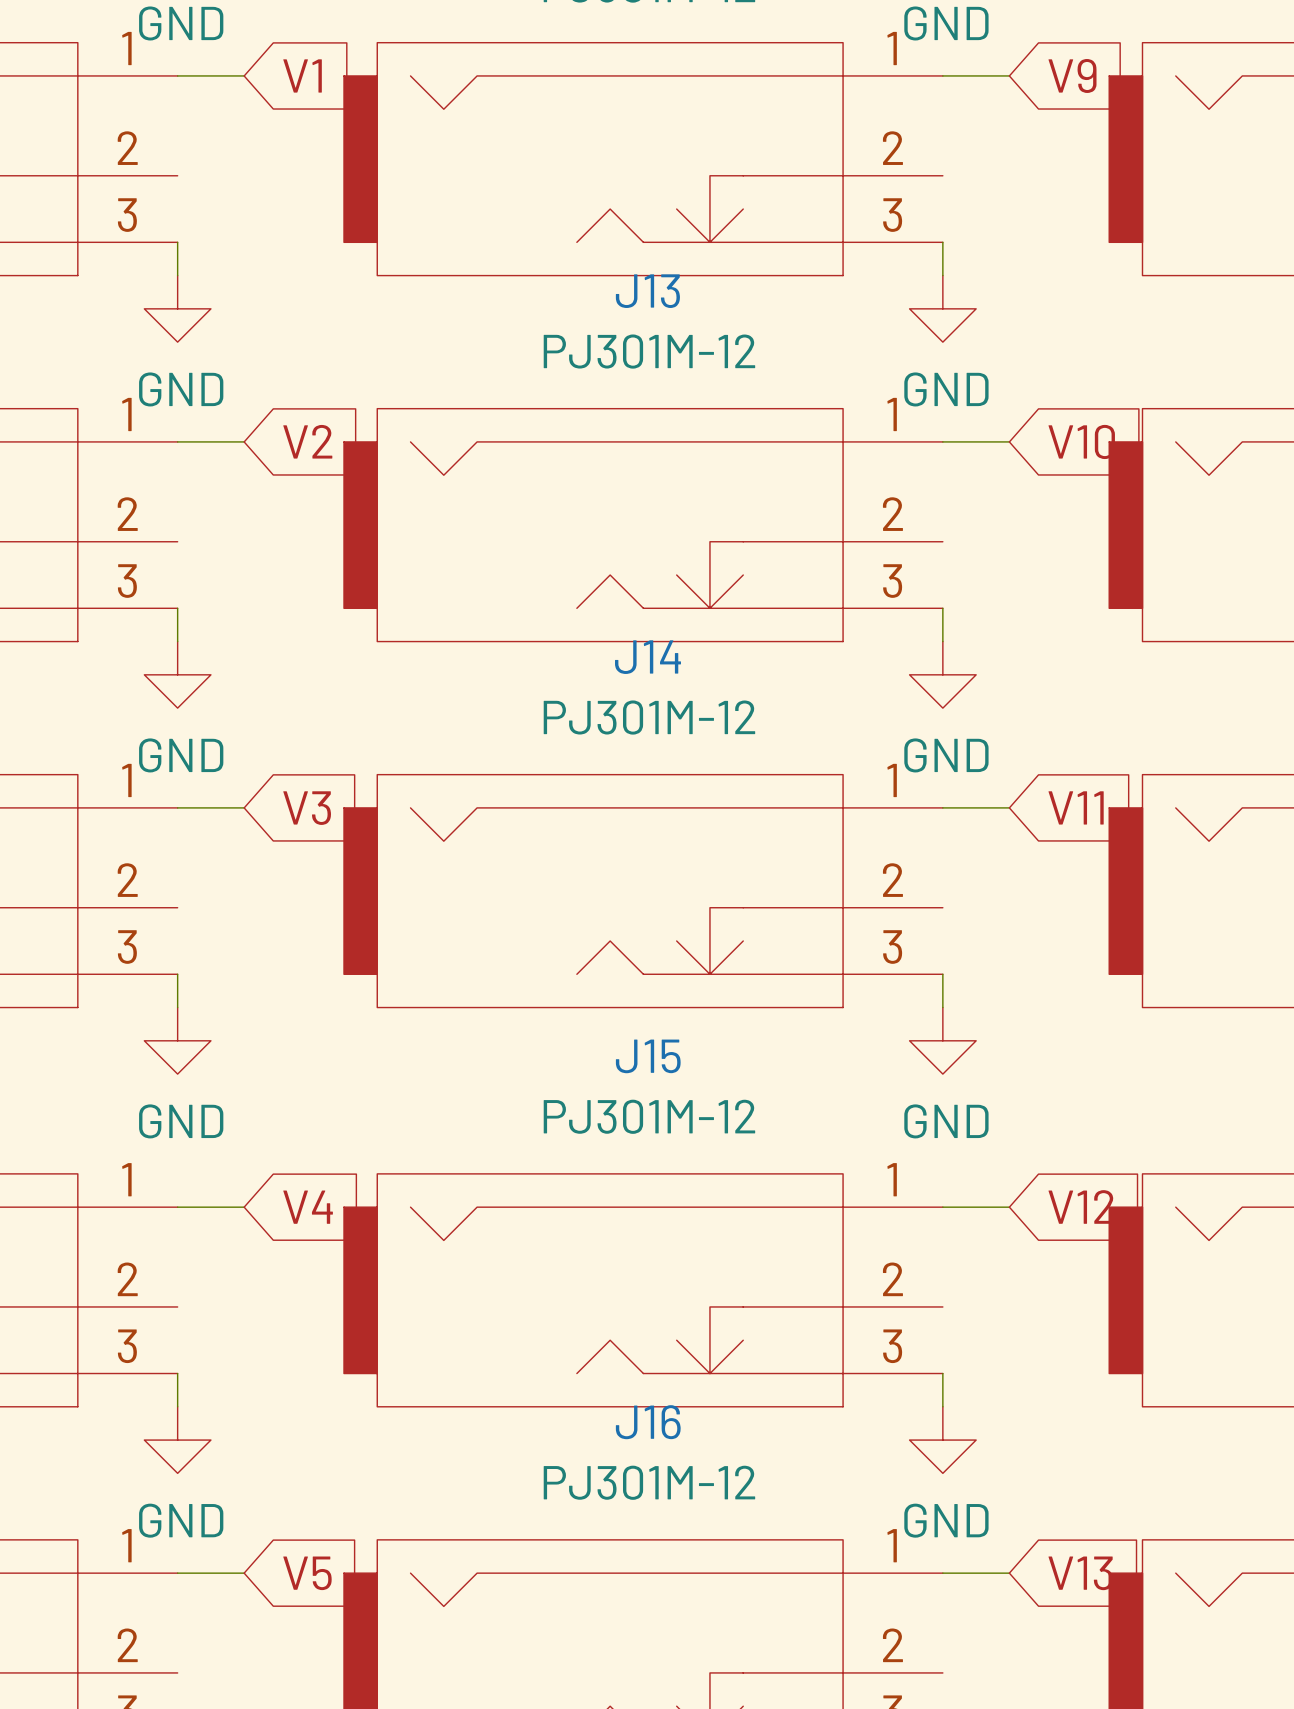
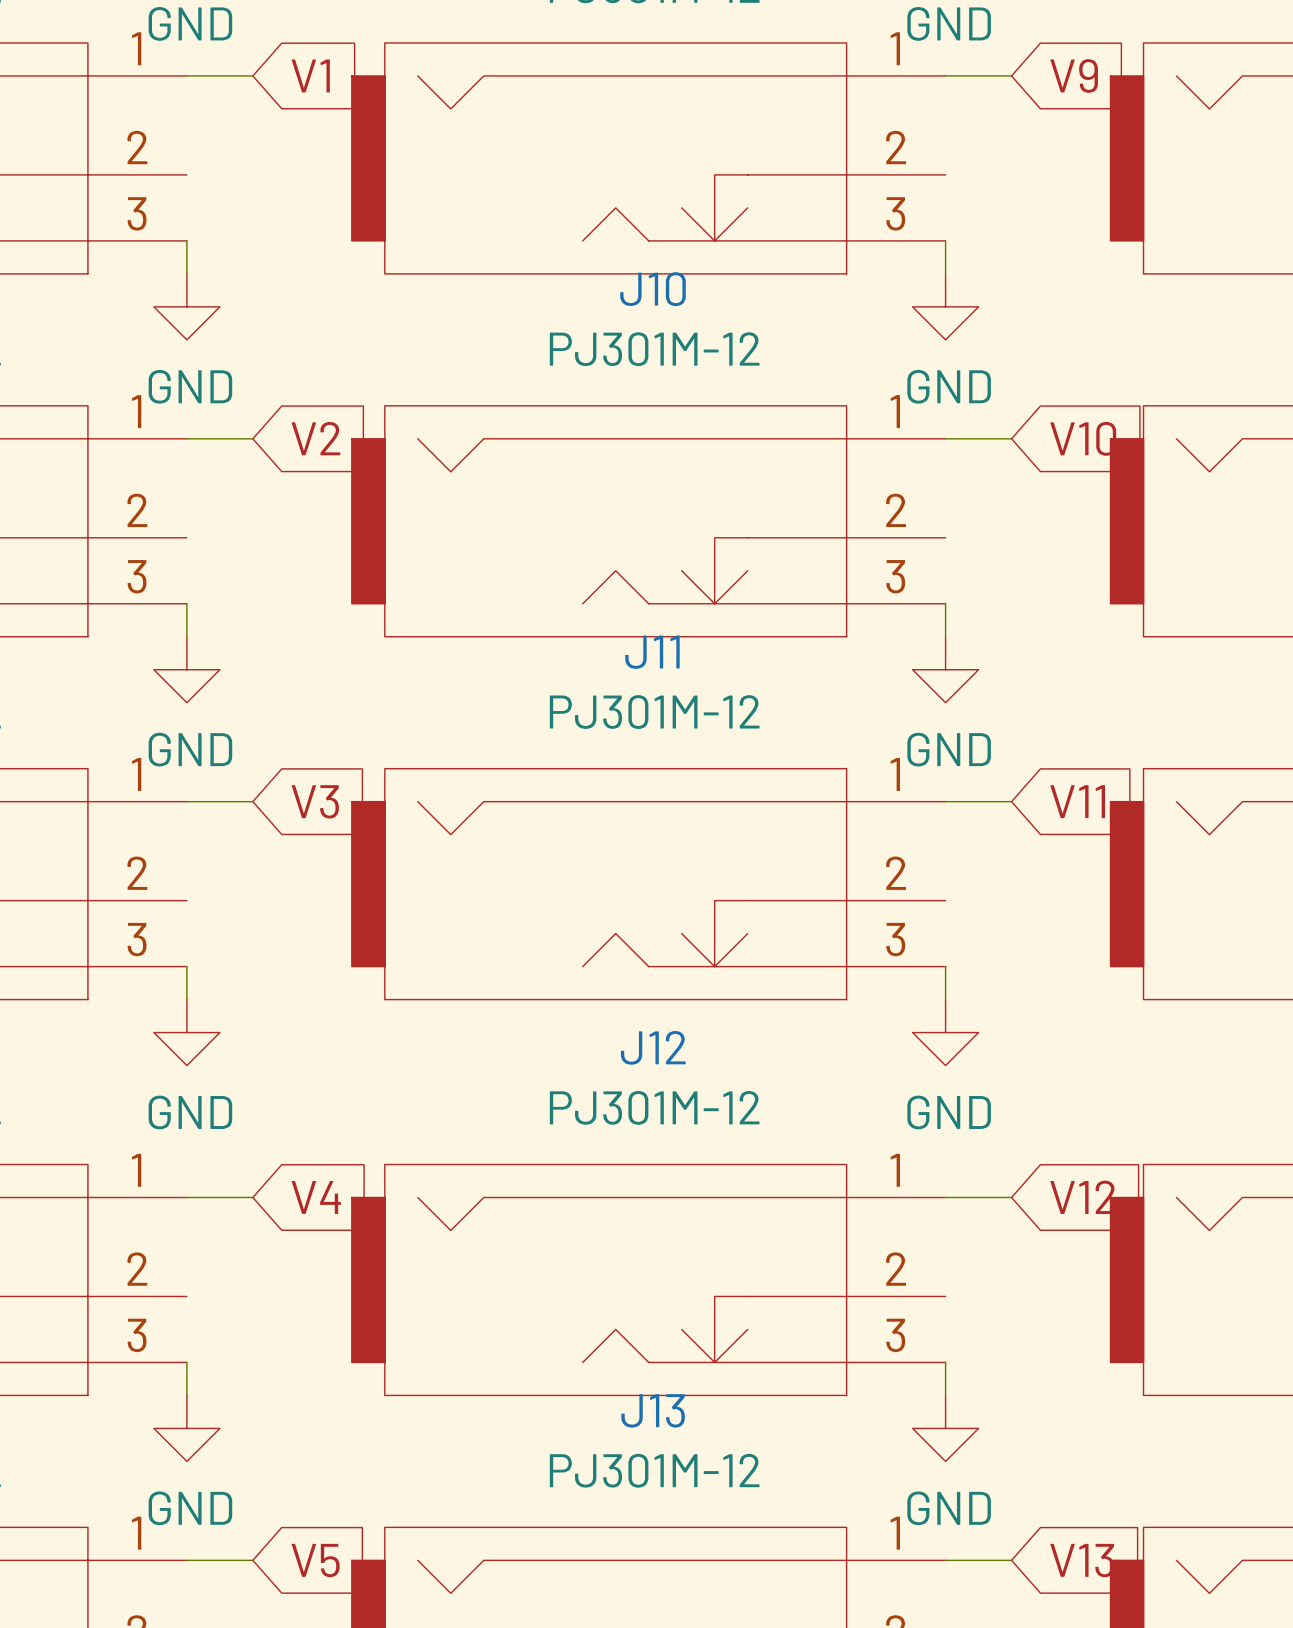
J13 name: J13 (647, 291) -> J10 (652, 289)
J14 name: J14 (647, 657) -> J11 (652, 652)
J15 name: J15 (648, 1056) -> J12 (653, 1047)
J16 name: J16 (648, 1422) -> J13 (653, 1410)

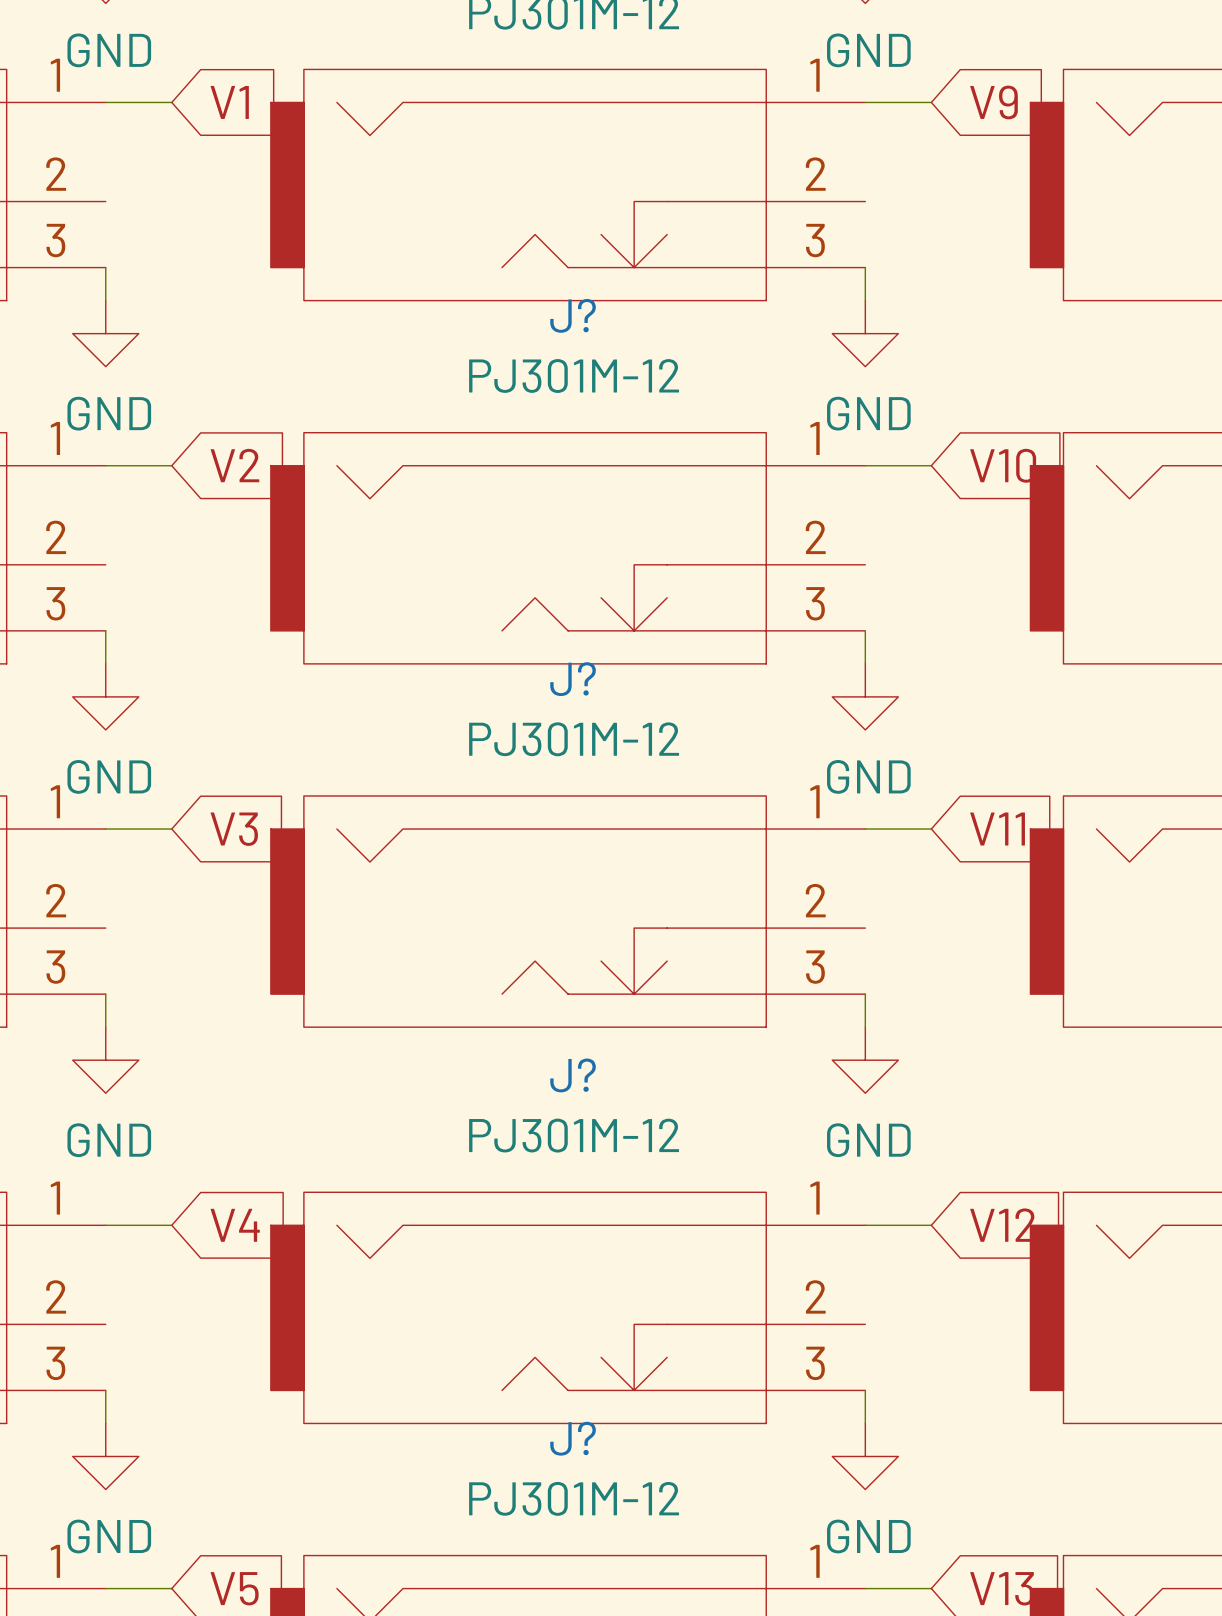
J10 name: J10 (652, 289) -> J? (573, 315)
J11 name: J11 (652, 652) -> J? (573, 679)
J12 name: J12 (653, 1047) -> J? (573, 1075)
J13 name: J13 (653, 1410) -> J? (573, 1438)

